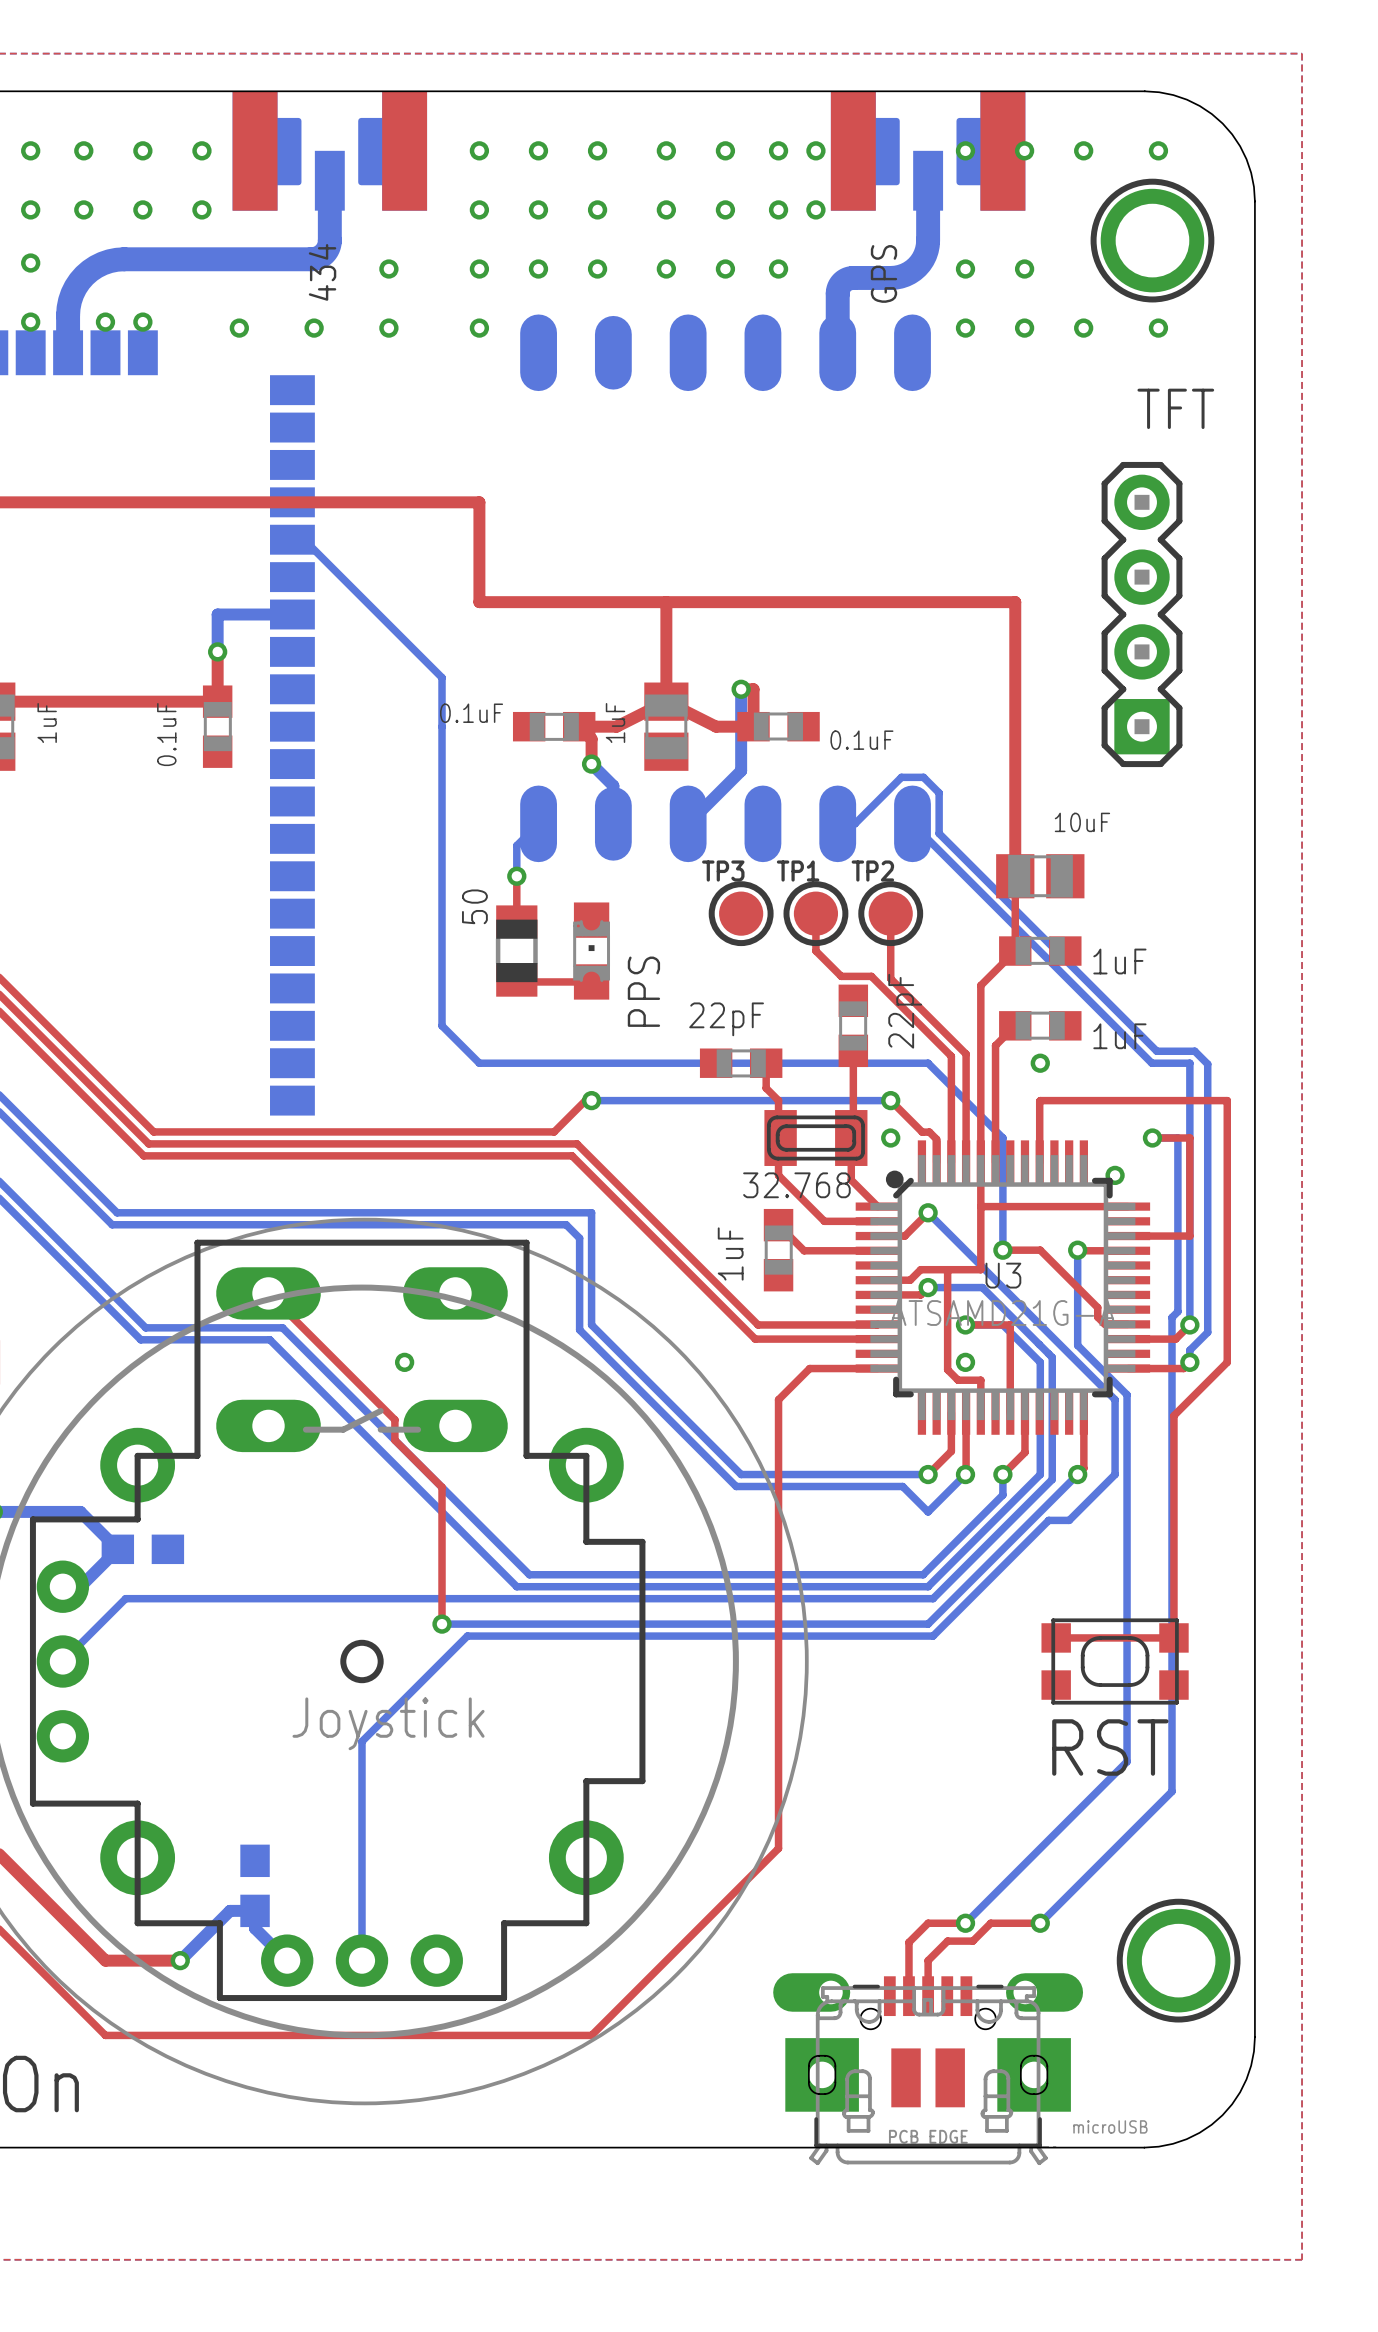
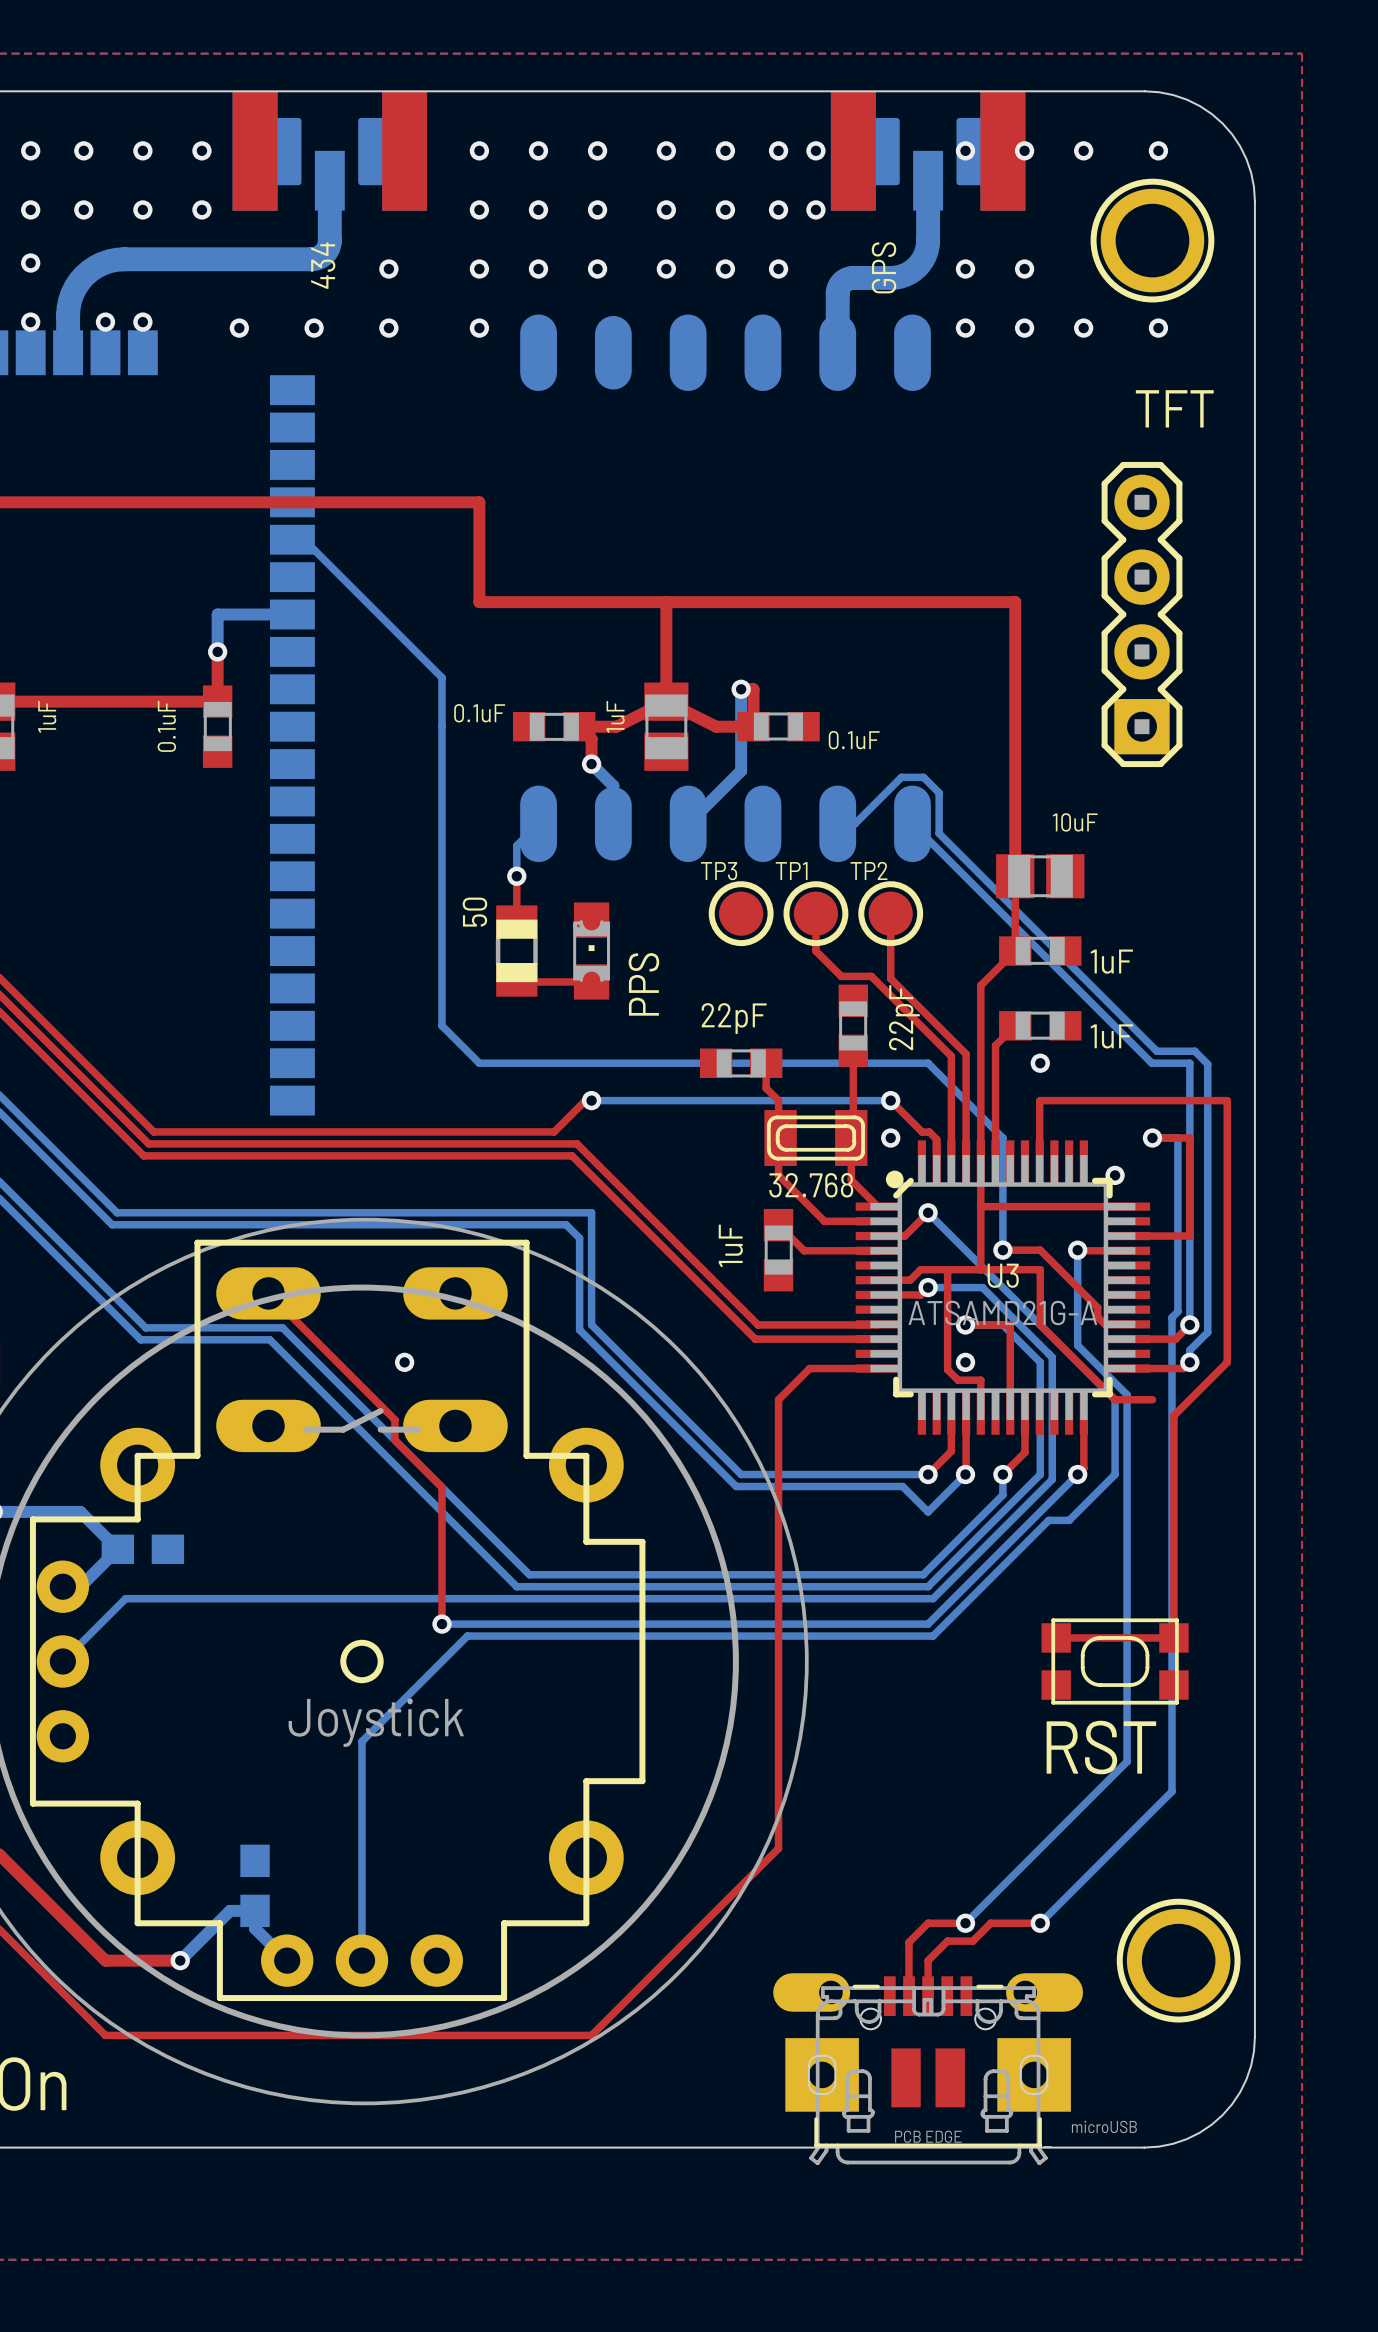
top track: none -> (980, 1269) (1040, 1269) (1040, 1324) (1115, 1399) (1152, 1399)

